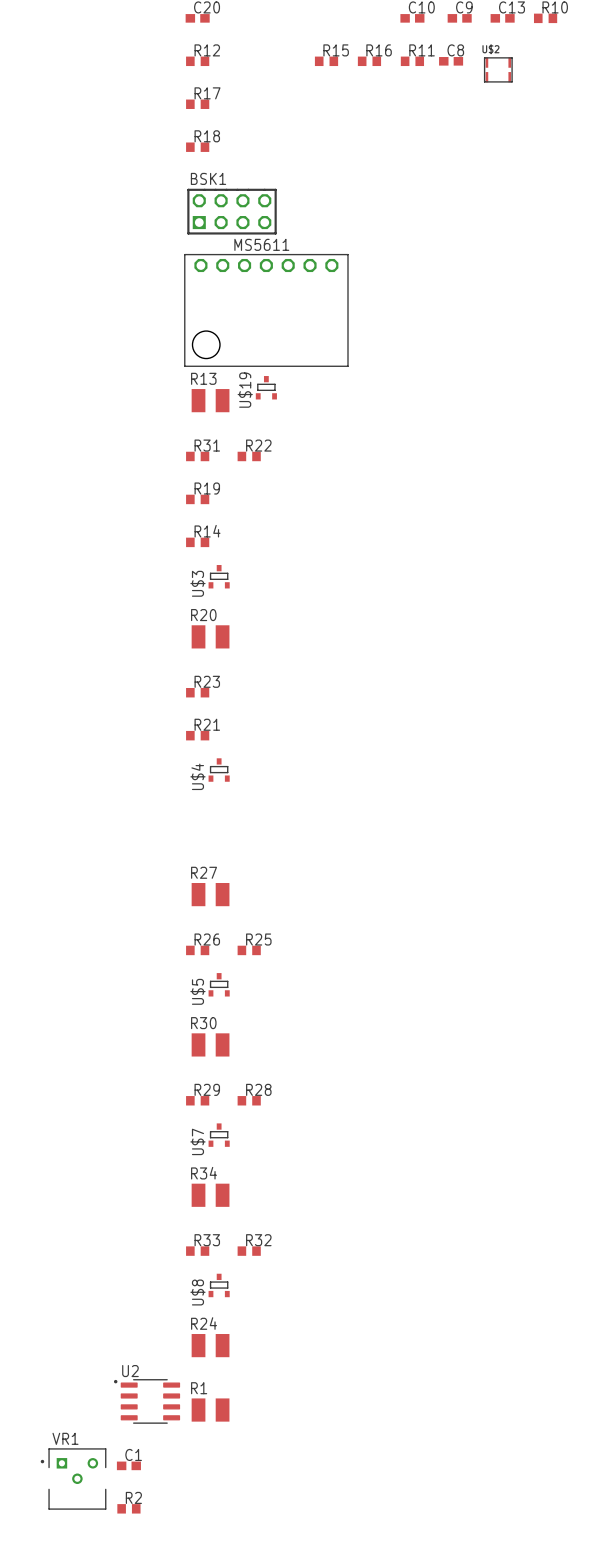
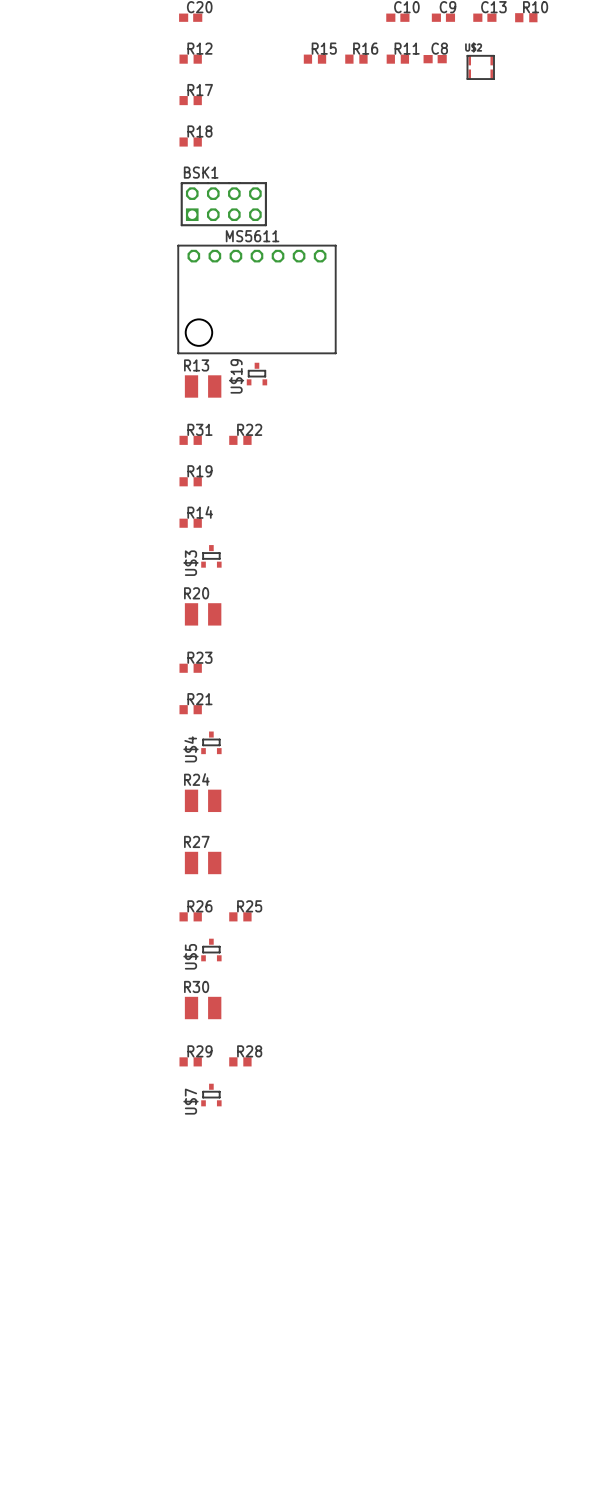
R34: (210, 1195) -> none
R33: (197, 1251) -> none
R32: (249, 1251) -> none
U$8: (219, 1285) -> none
R24 position: (210, 1345) -> (203, 800)
U2: (147, 1401) -> none
R1: (210, 1410) -> none
C1: (128, 1465) -> none
VR1: (73, 1479) -> none
R2: (128, 1508) -> none

